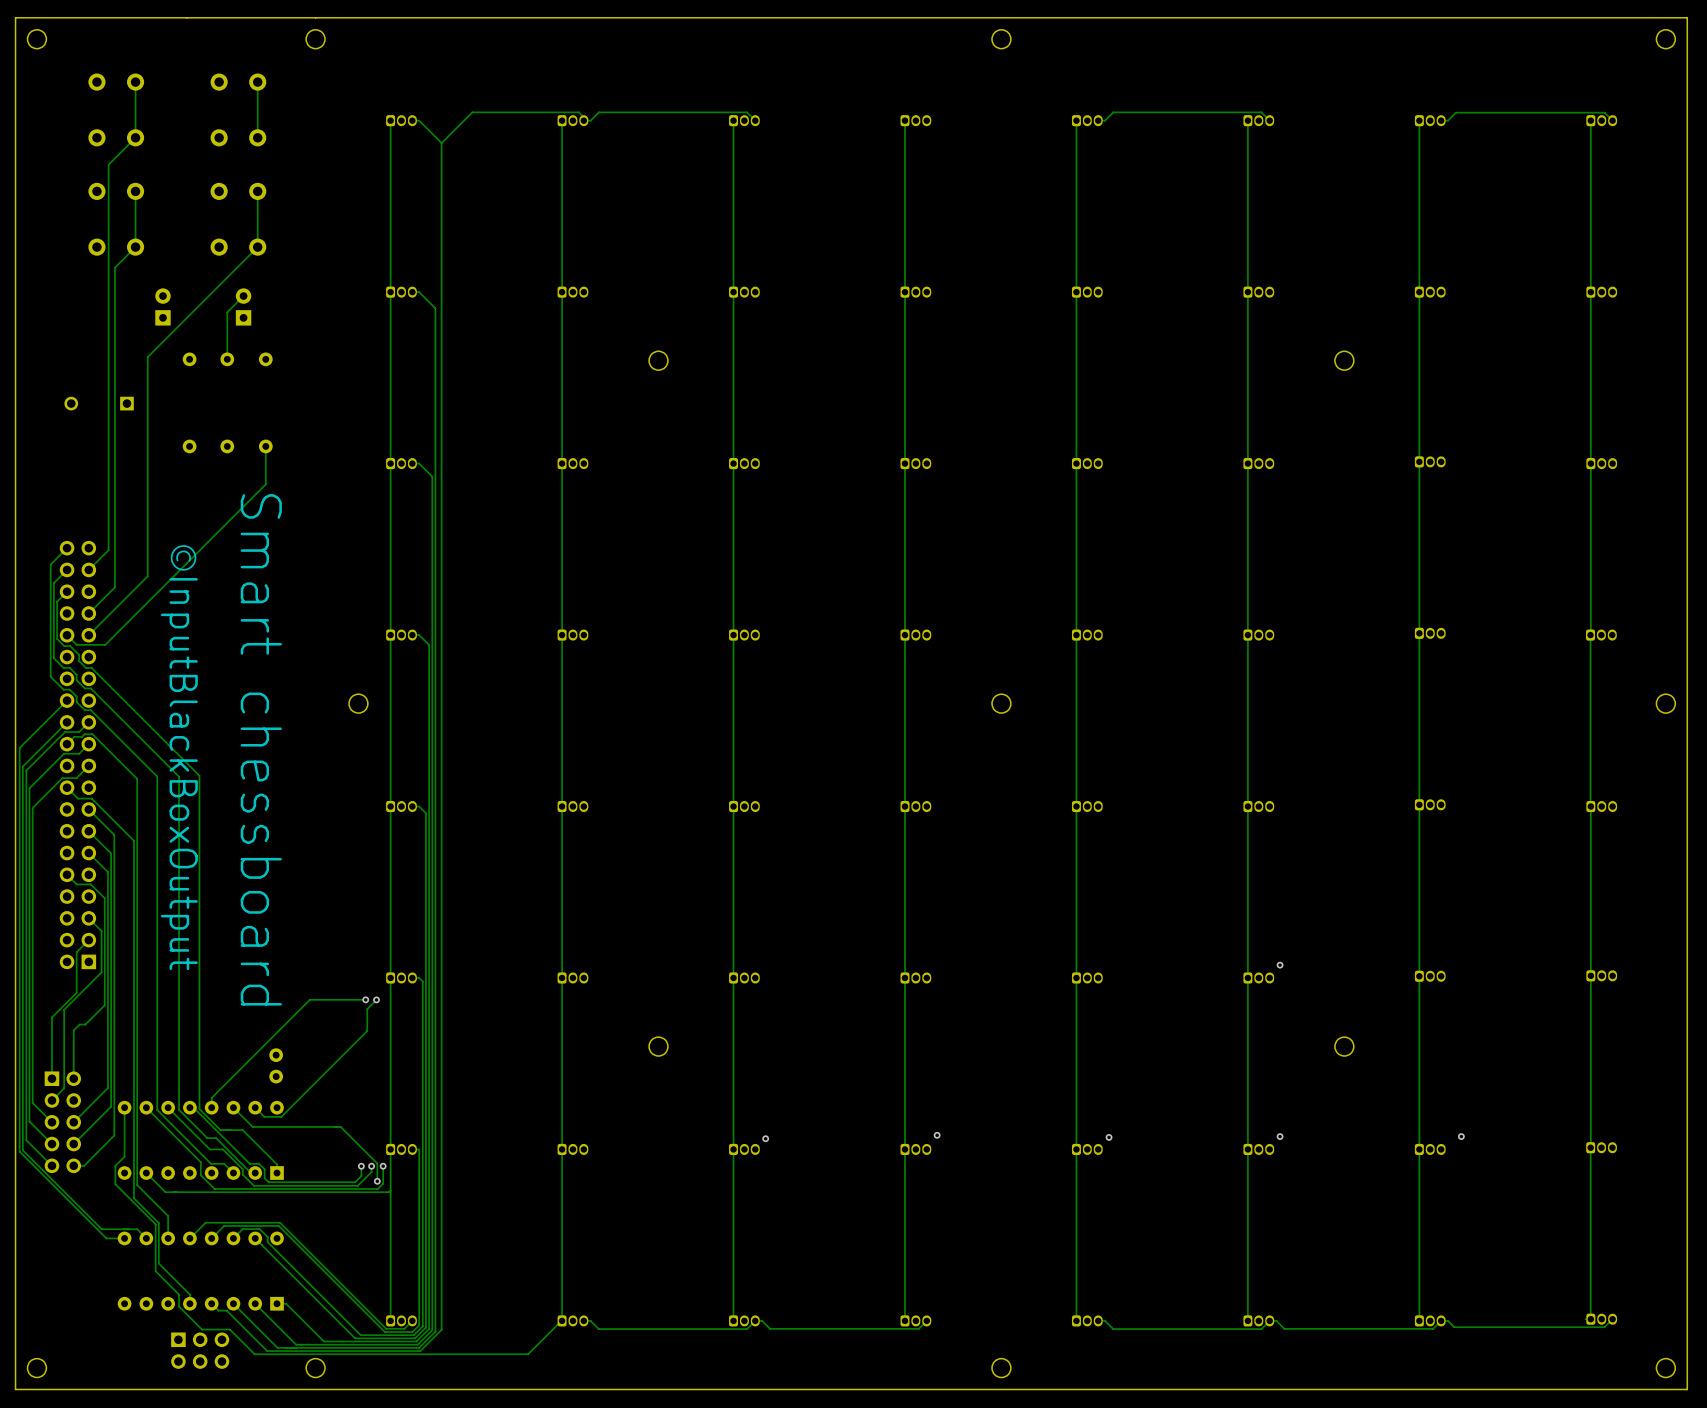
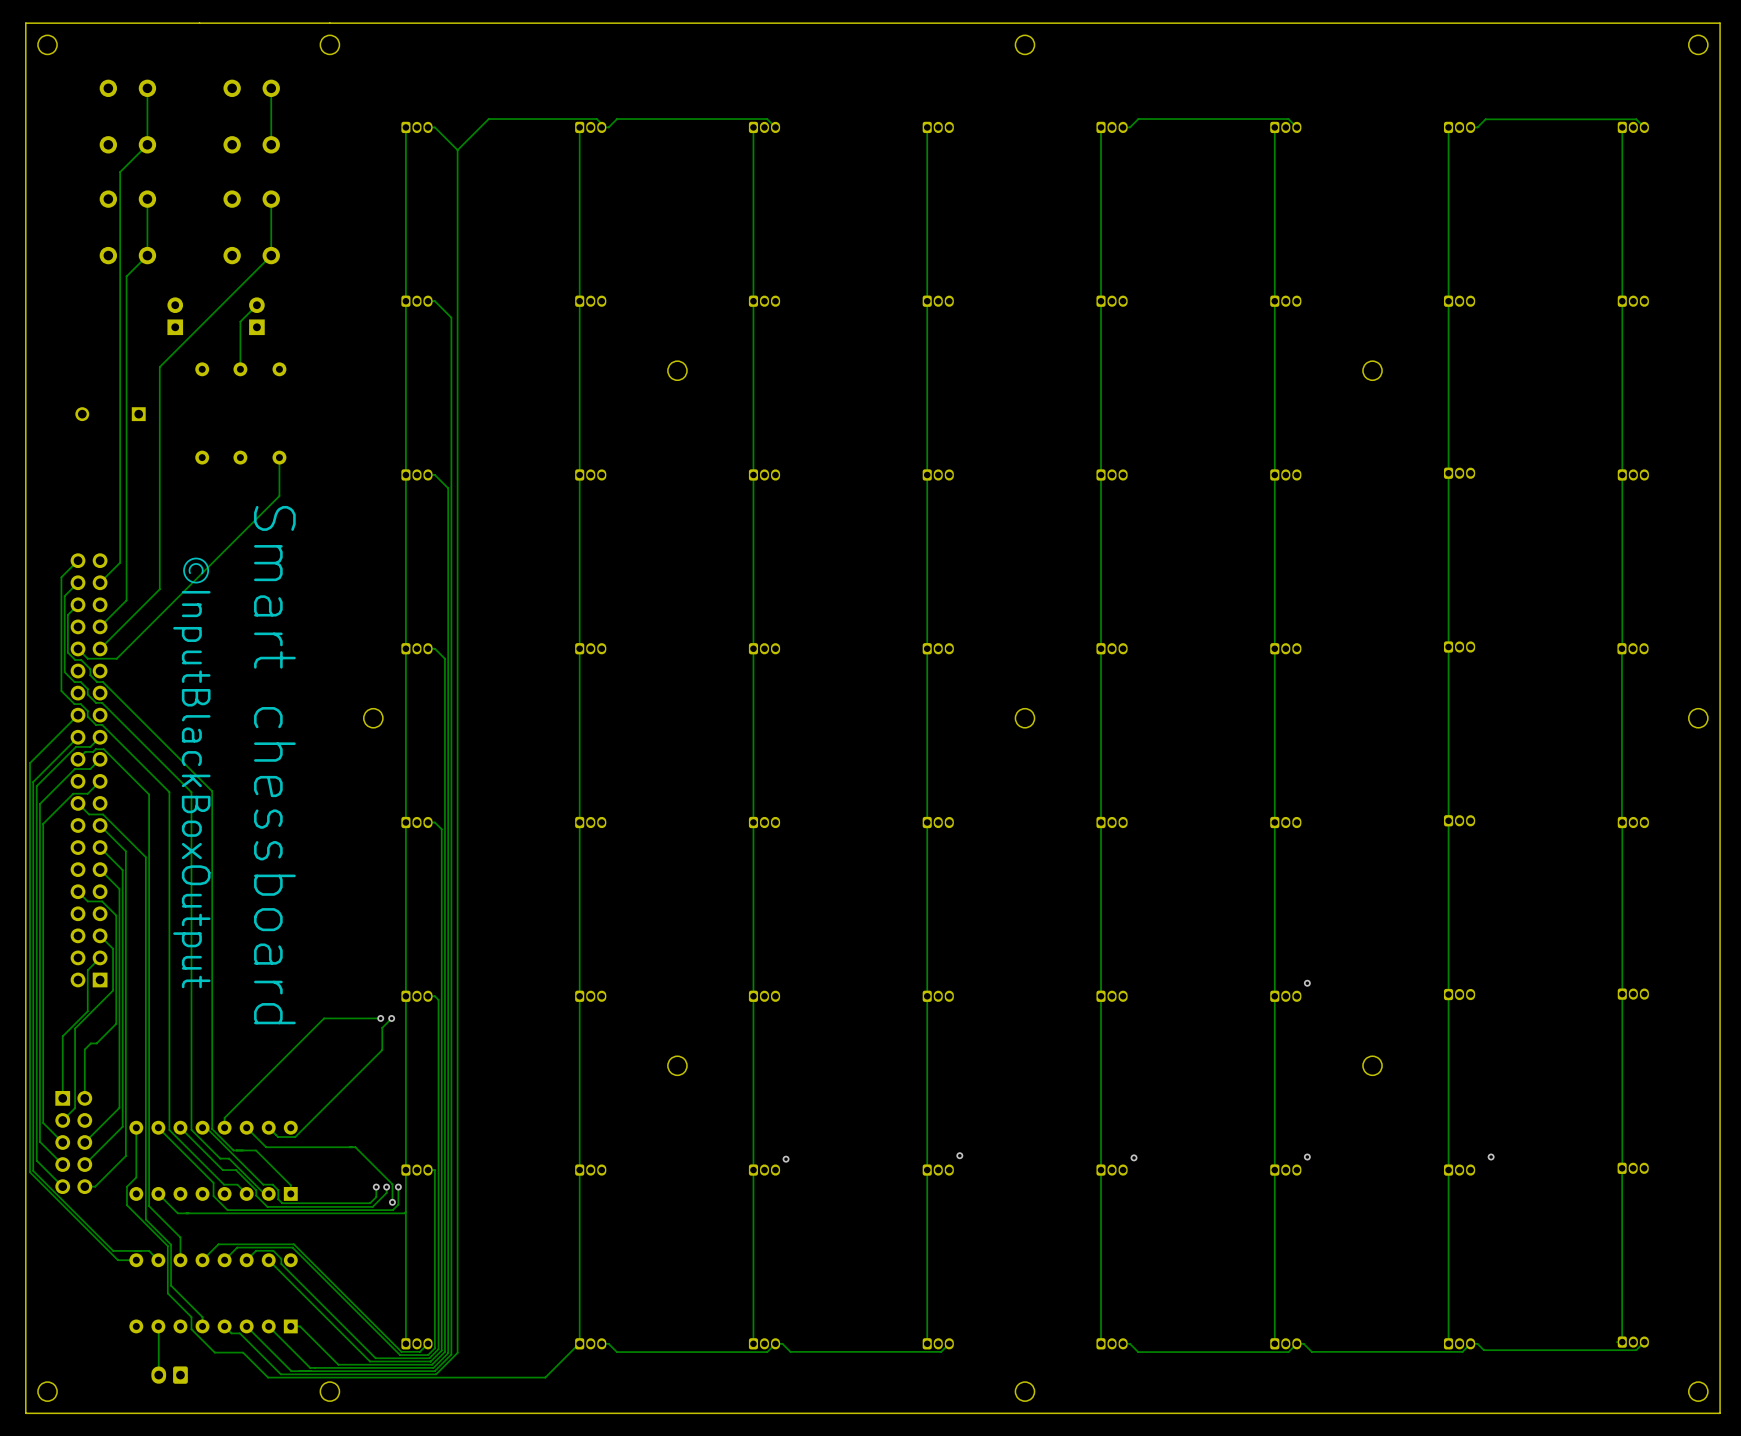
part: (276, 1065) -> none
track: none -> (158, 1326) (158, 1375)
part: (200, 1350) -> none
part: none -> (169, 1375)

